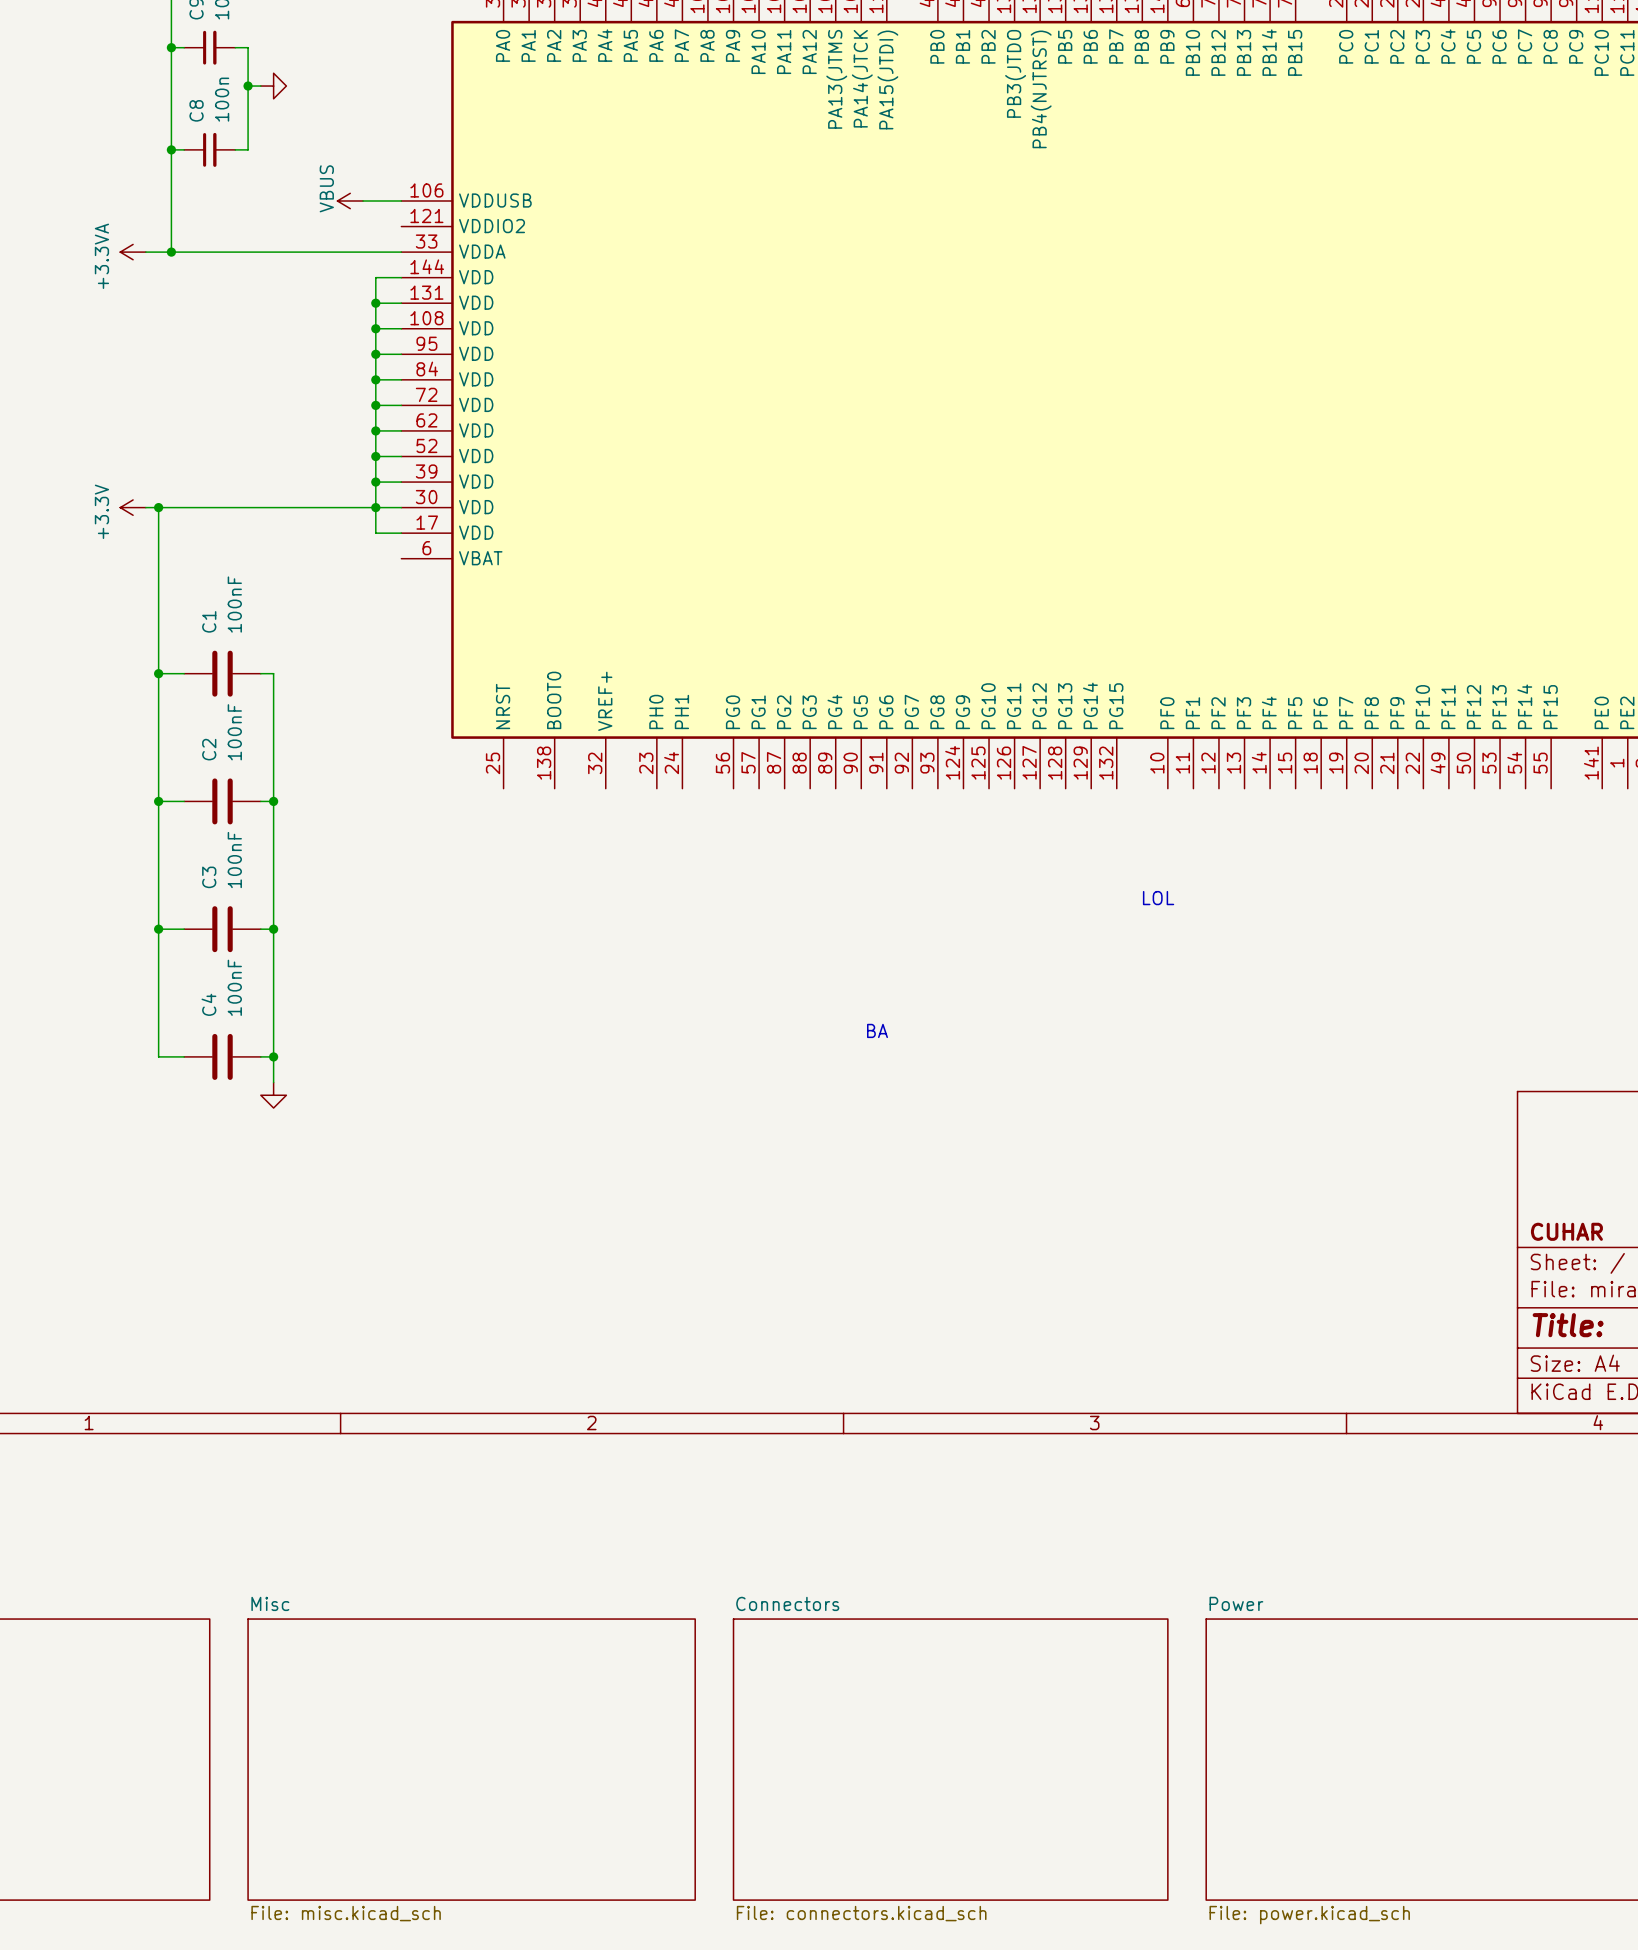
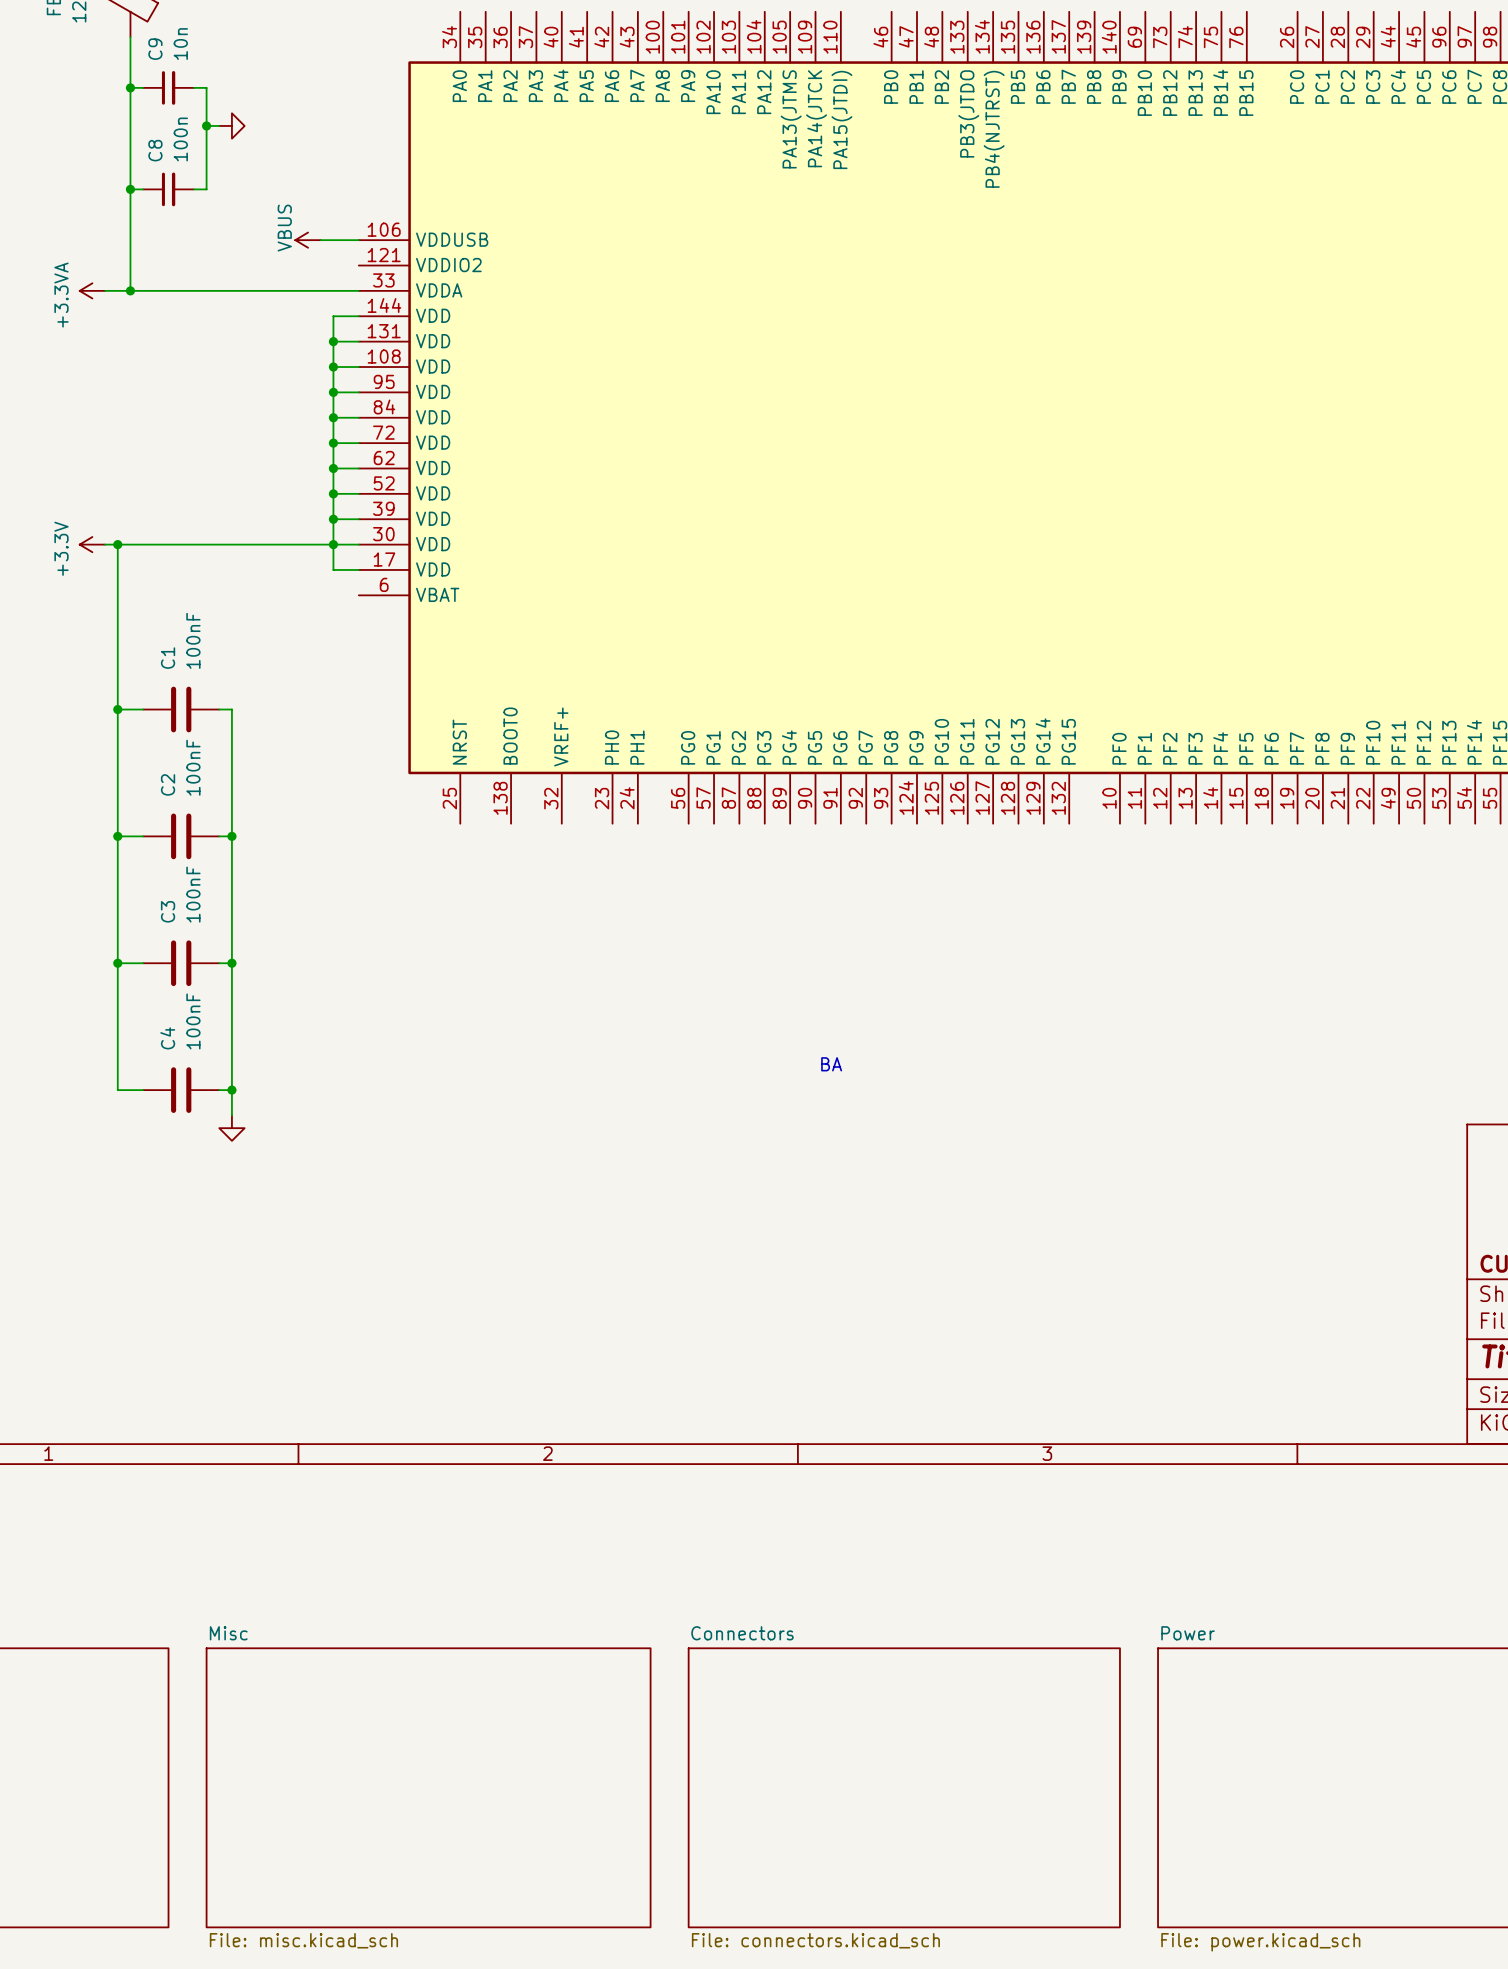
text: LOL (1158, 898) -> none

